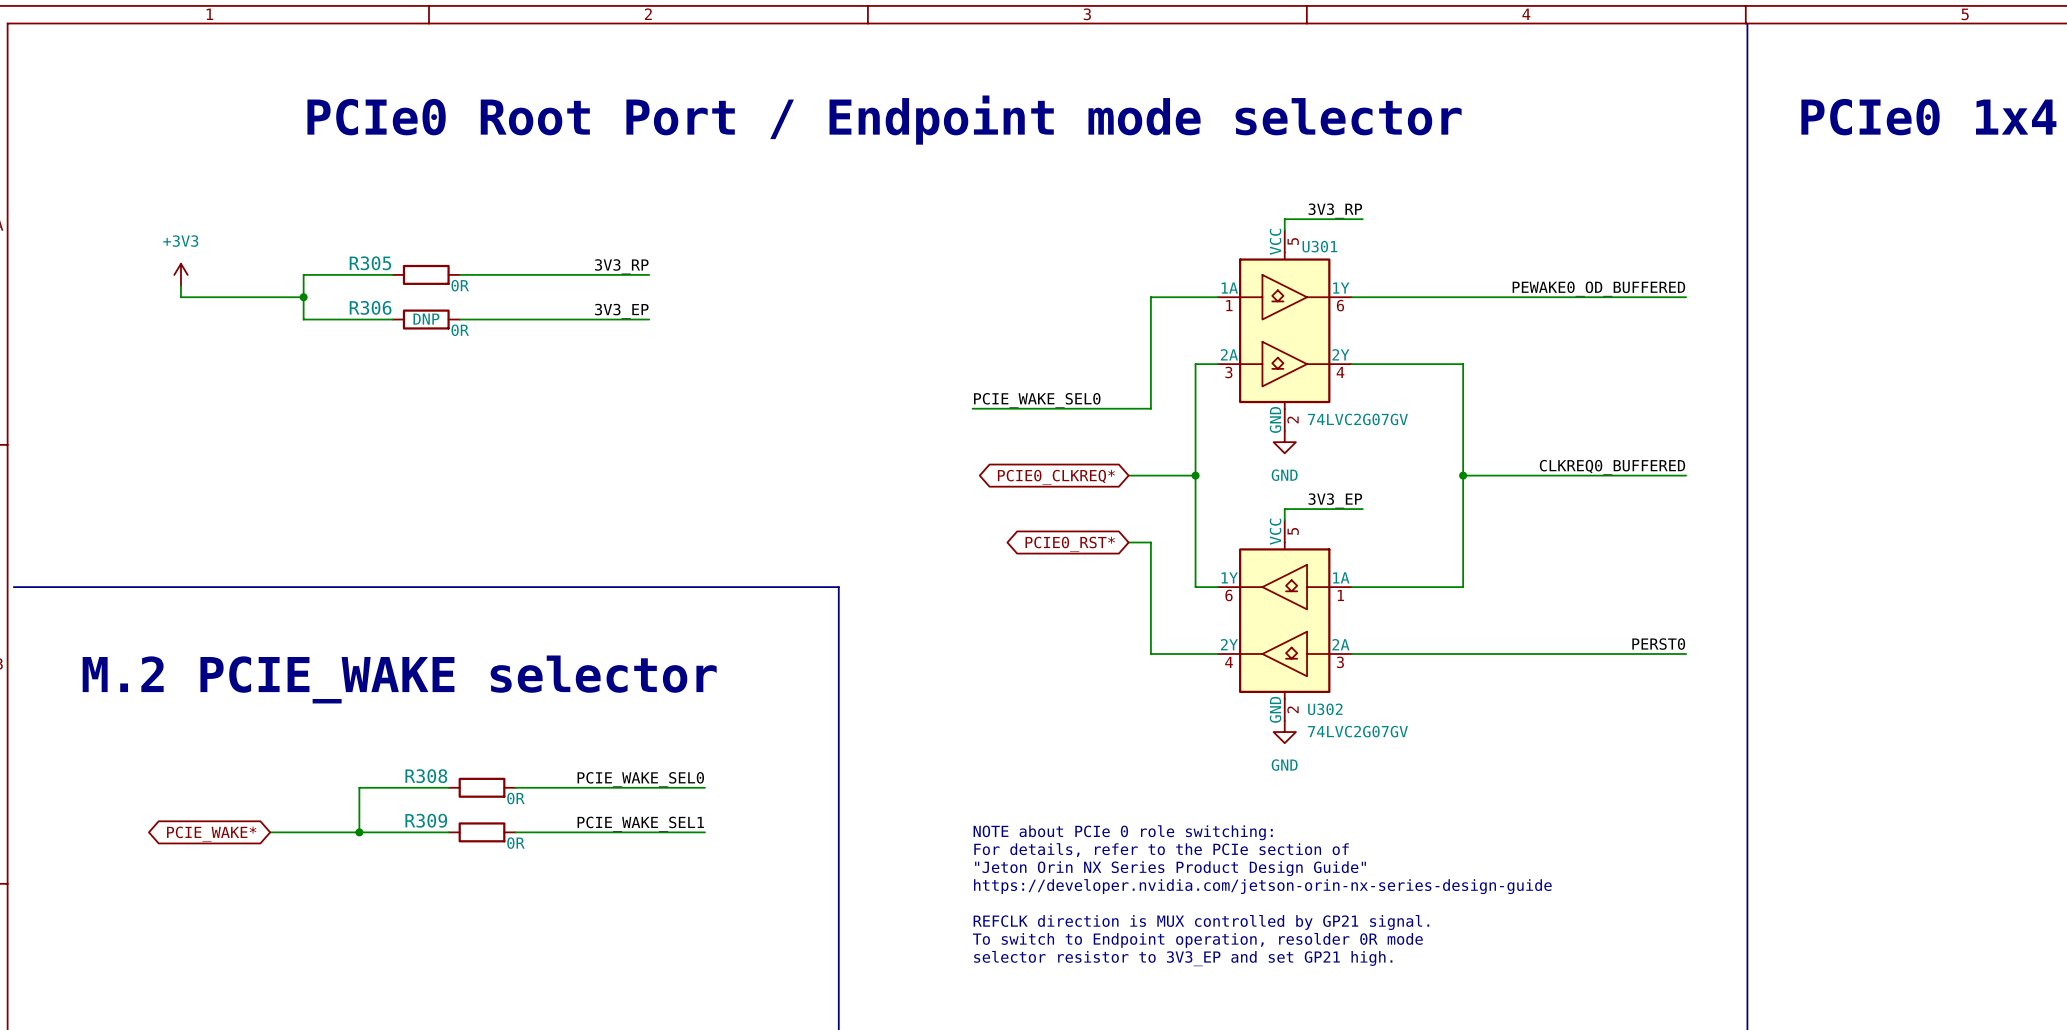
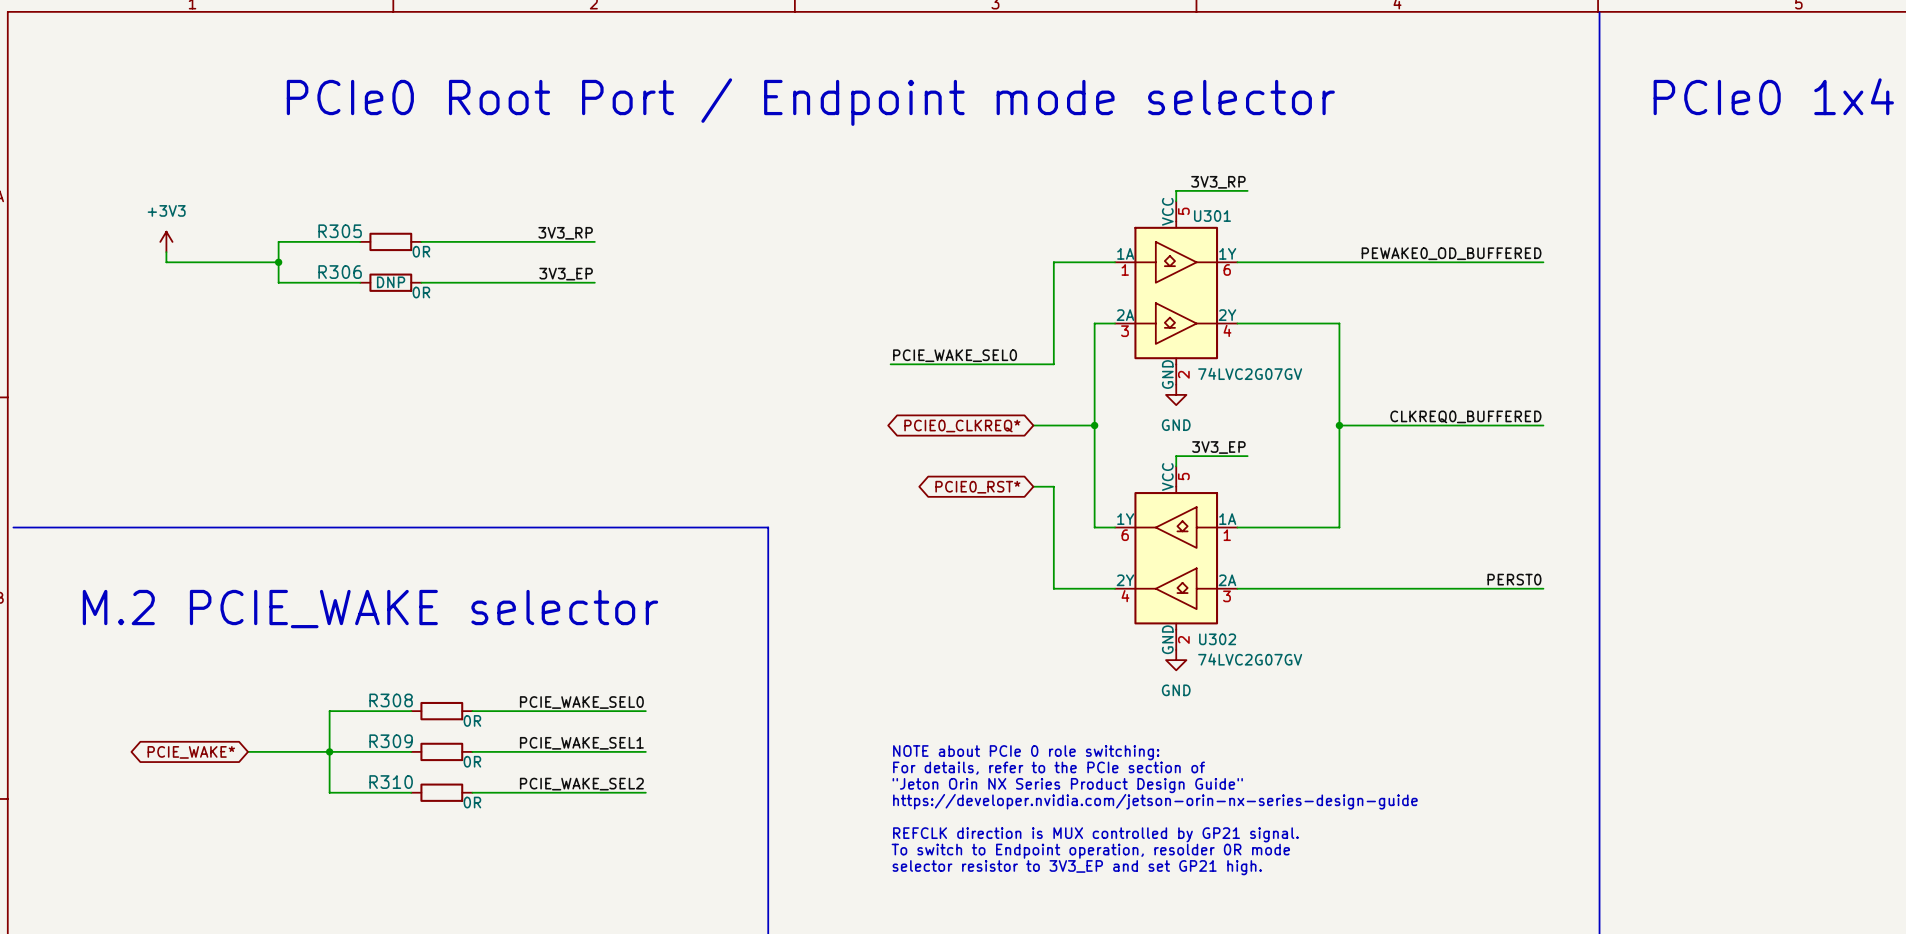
wire: none -> (329, 751) (329, 792) (411, 792)
label: none -> PCIE_WAKE_SEL2 (581, 784)
R310: none -> (441, 792)
wire: none -> (472, 792) (645, 792)

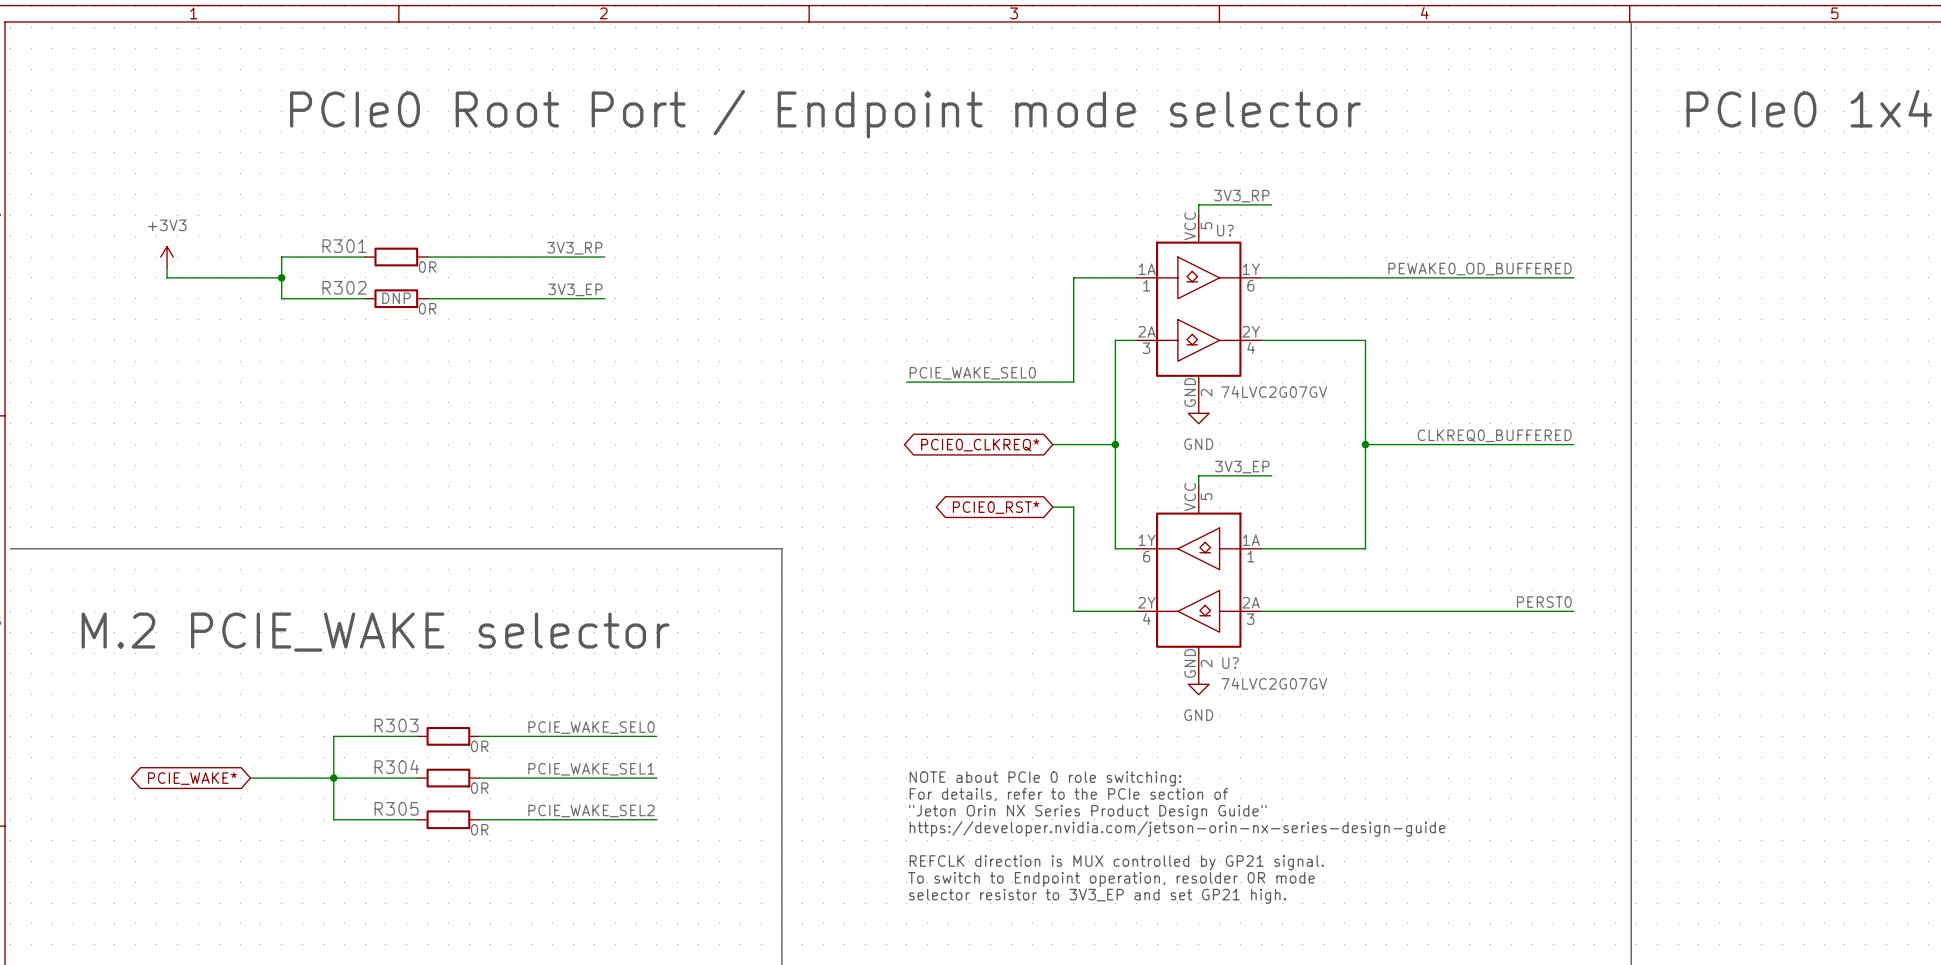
U301 name: U301 (1212, 216) -> U? (1225, 230)
R305 name: R305 (340, 231) -> R301 (344, 246)
R306 name: R306 (340, 272) -> R302 (344, 287)
U302 name: U302 (1217, 639) -> U? (1230, 663)
R308 name: R308 (391, 700) -> R303 (396, 725)
R309 name: R309 (391, 741) -> R304 (396, 766)
R310 name: R310 (391, 782) -> R305 (396, 808)

